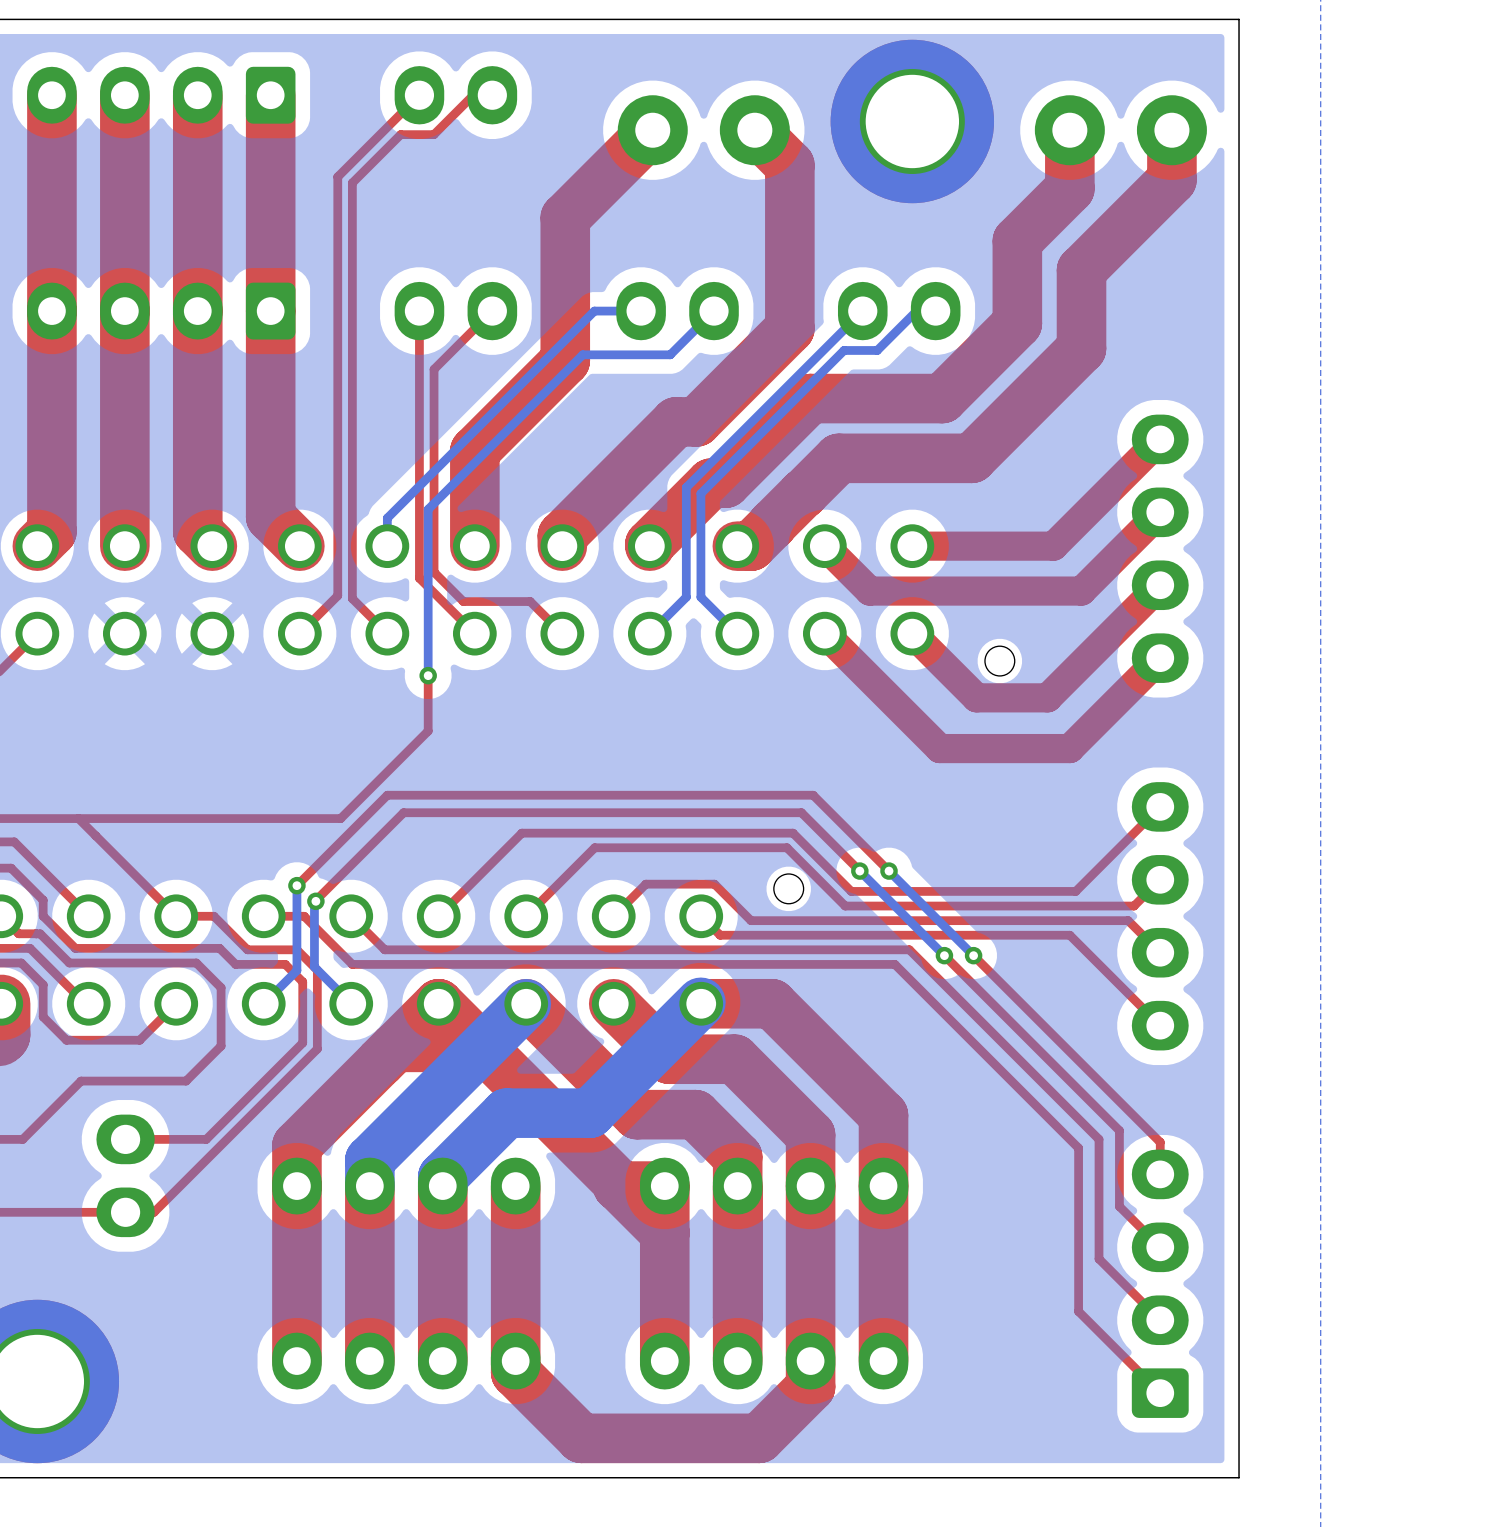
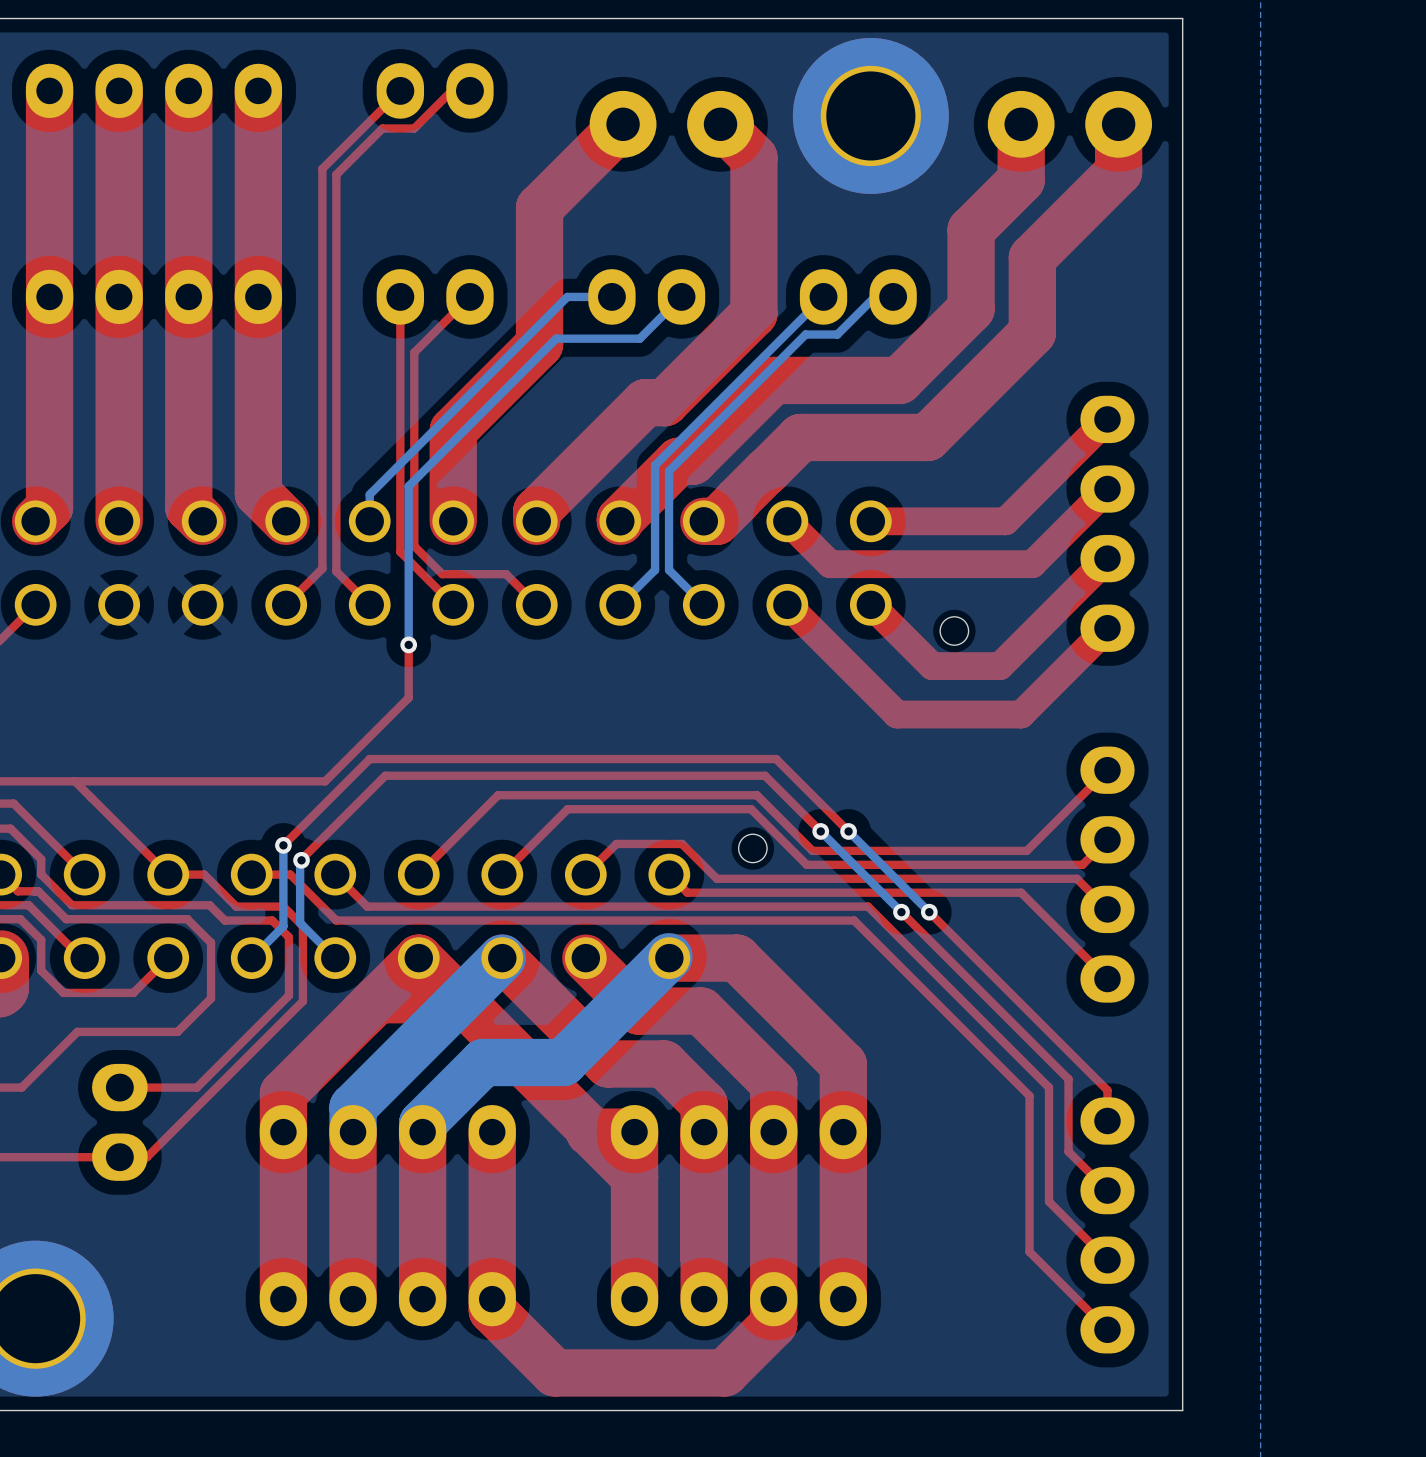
part footprint: [27, 66, 296, 124] -> [25, 63, 283, 119]
part footprint: [27, 282, 296, 340] -> [25, 269, 283, 325]
part footprint: [1131, 1149, 1189, 1418] -> [1080, 1097, 1135, 1354]

